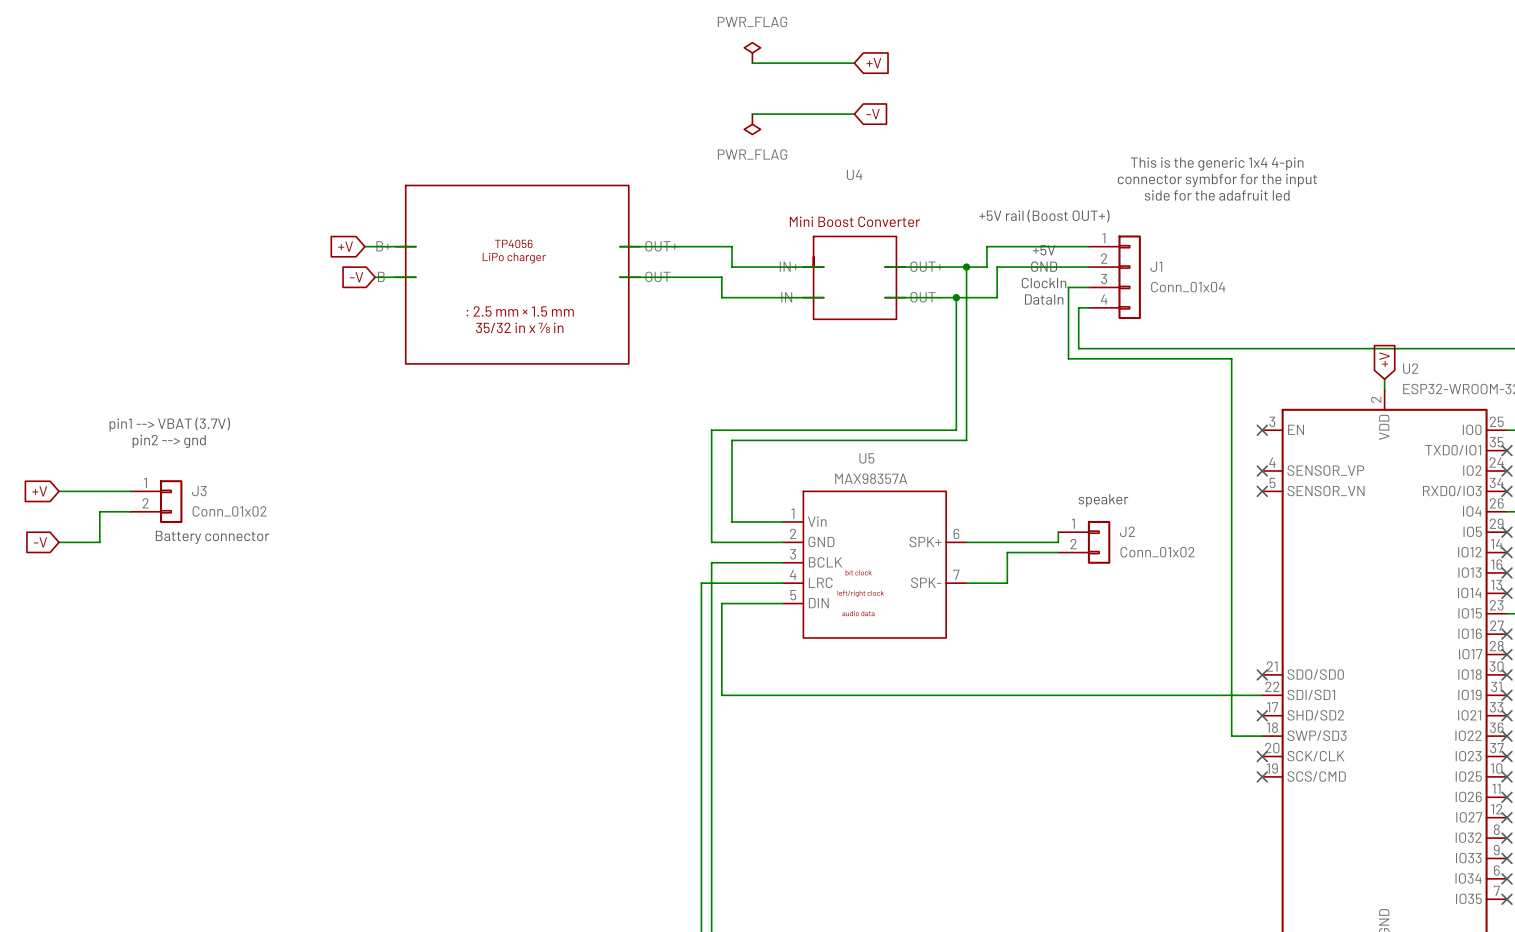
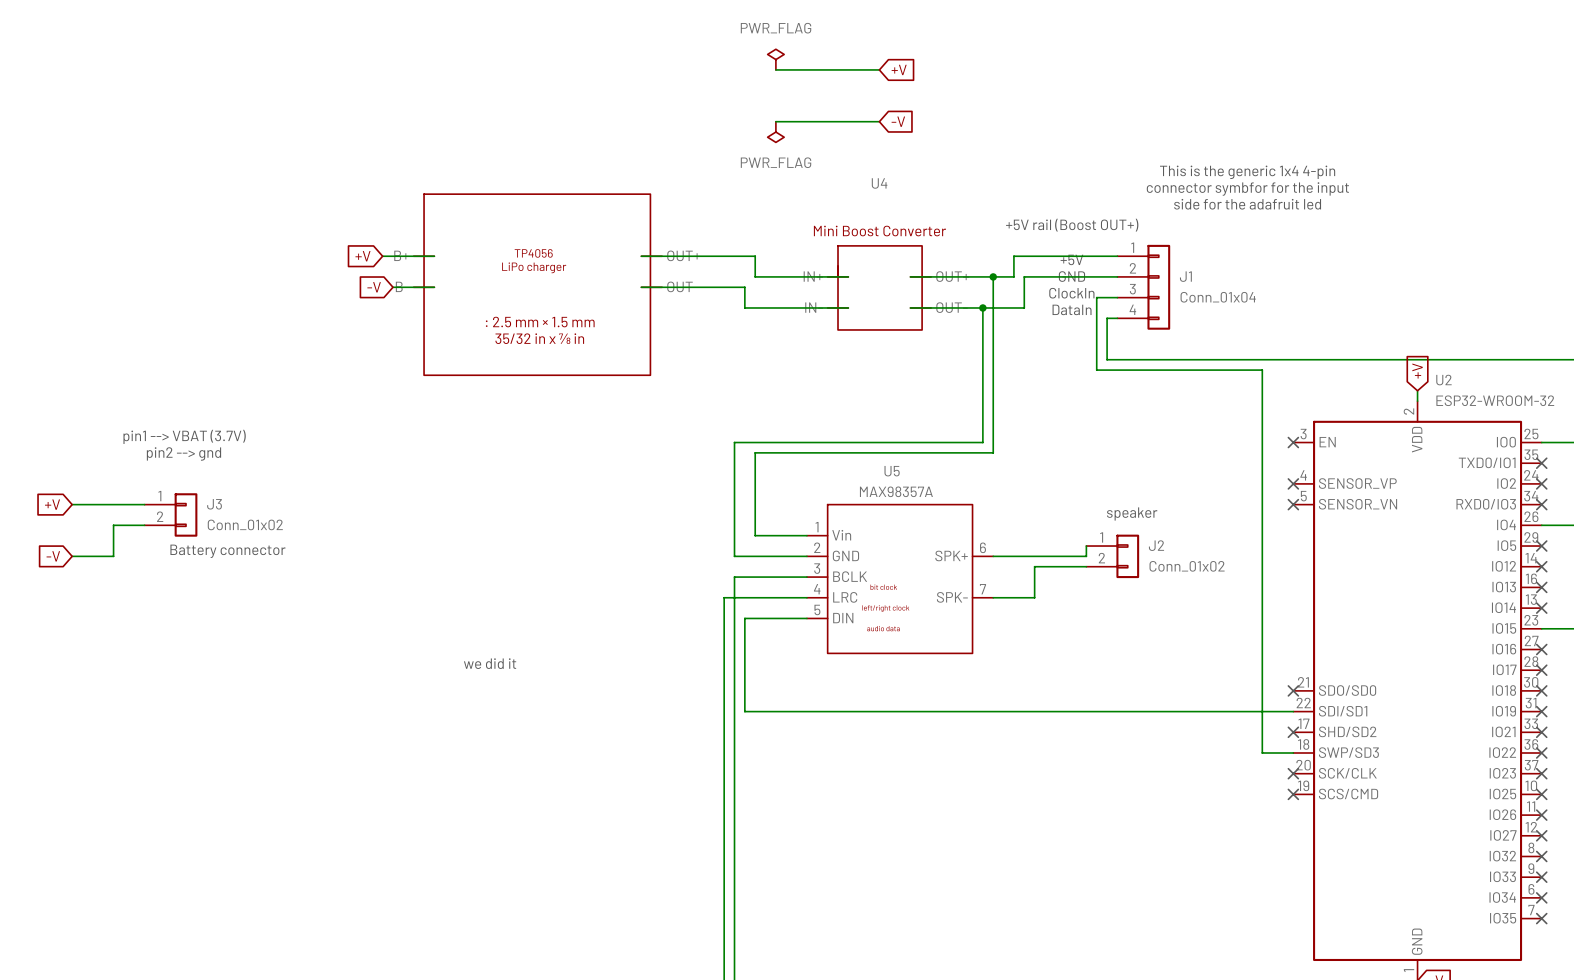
text: none -> we did it (490, 663)

